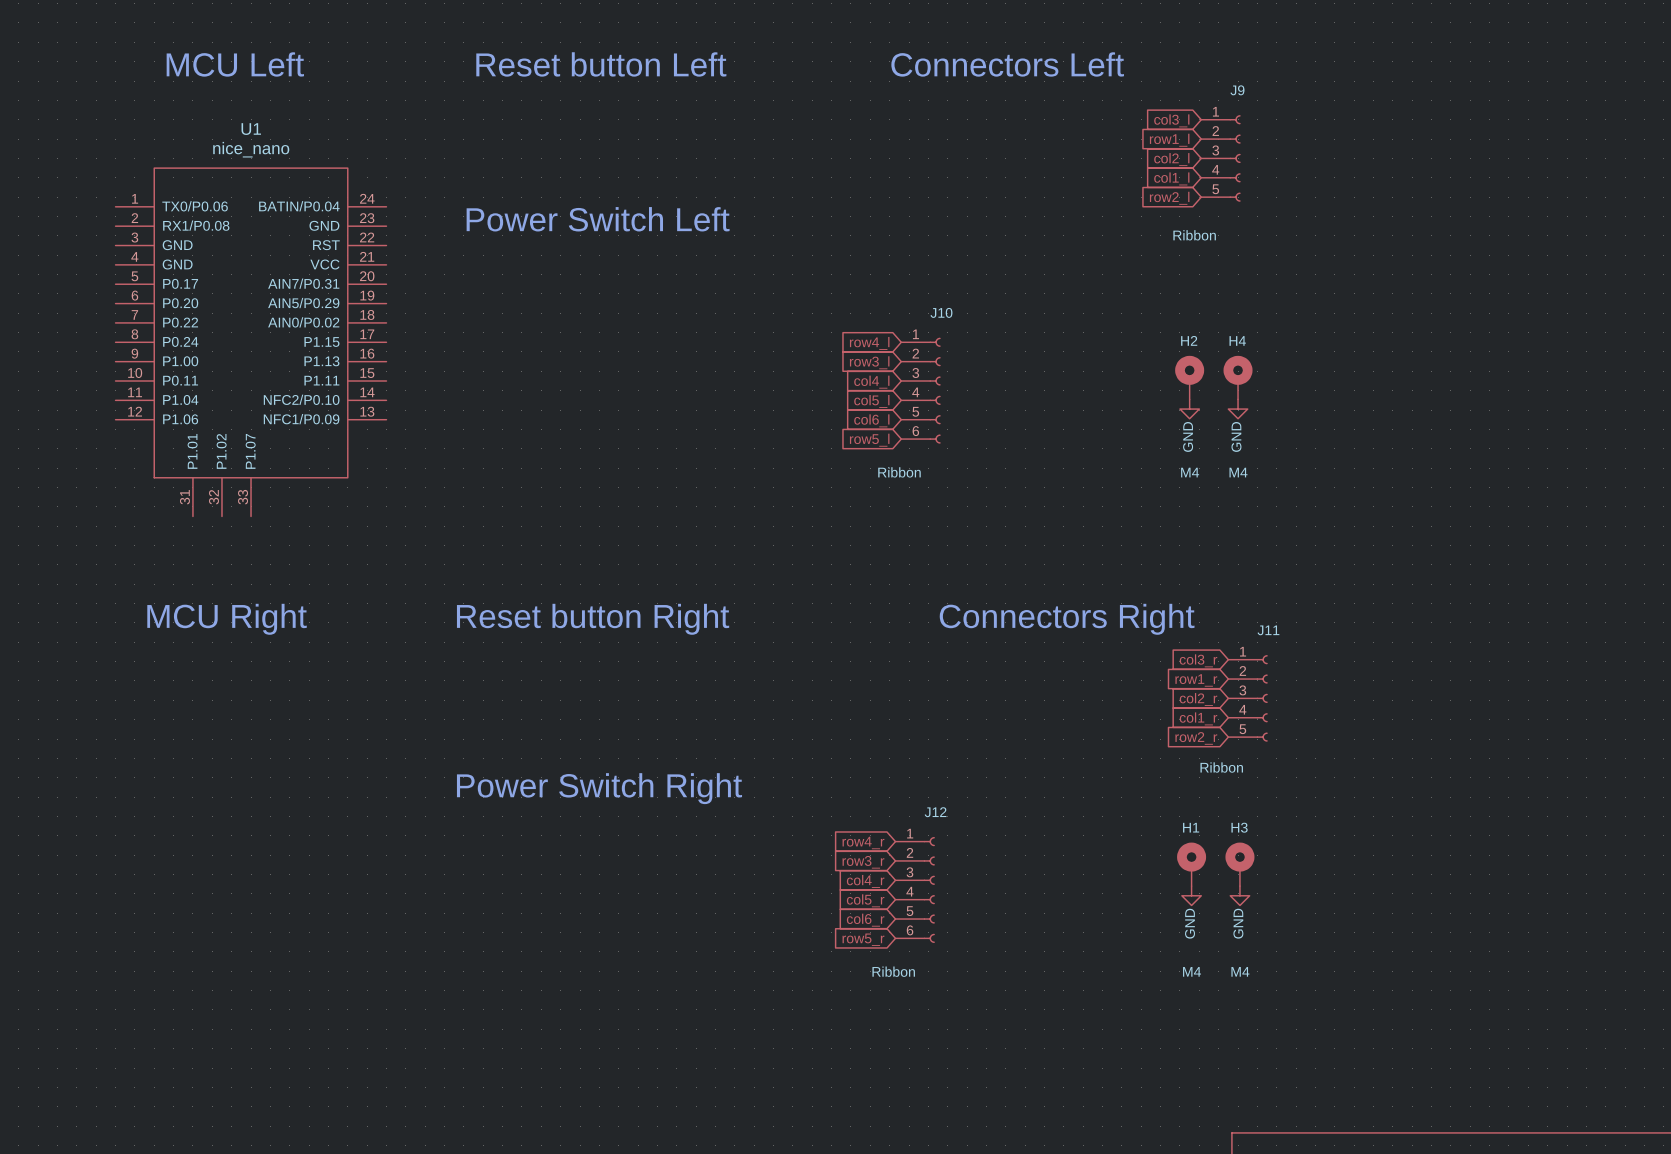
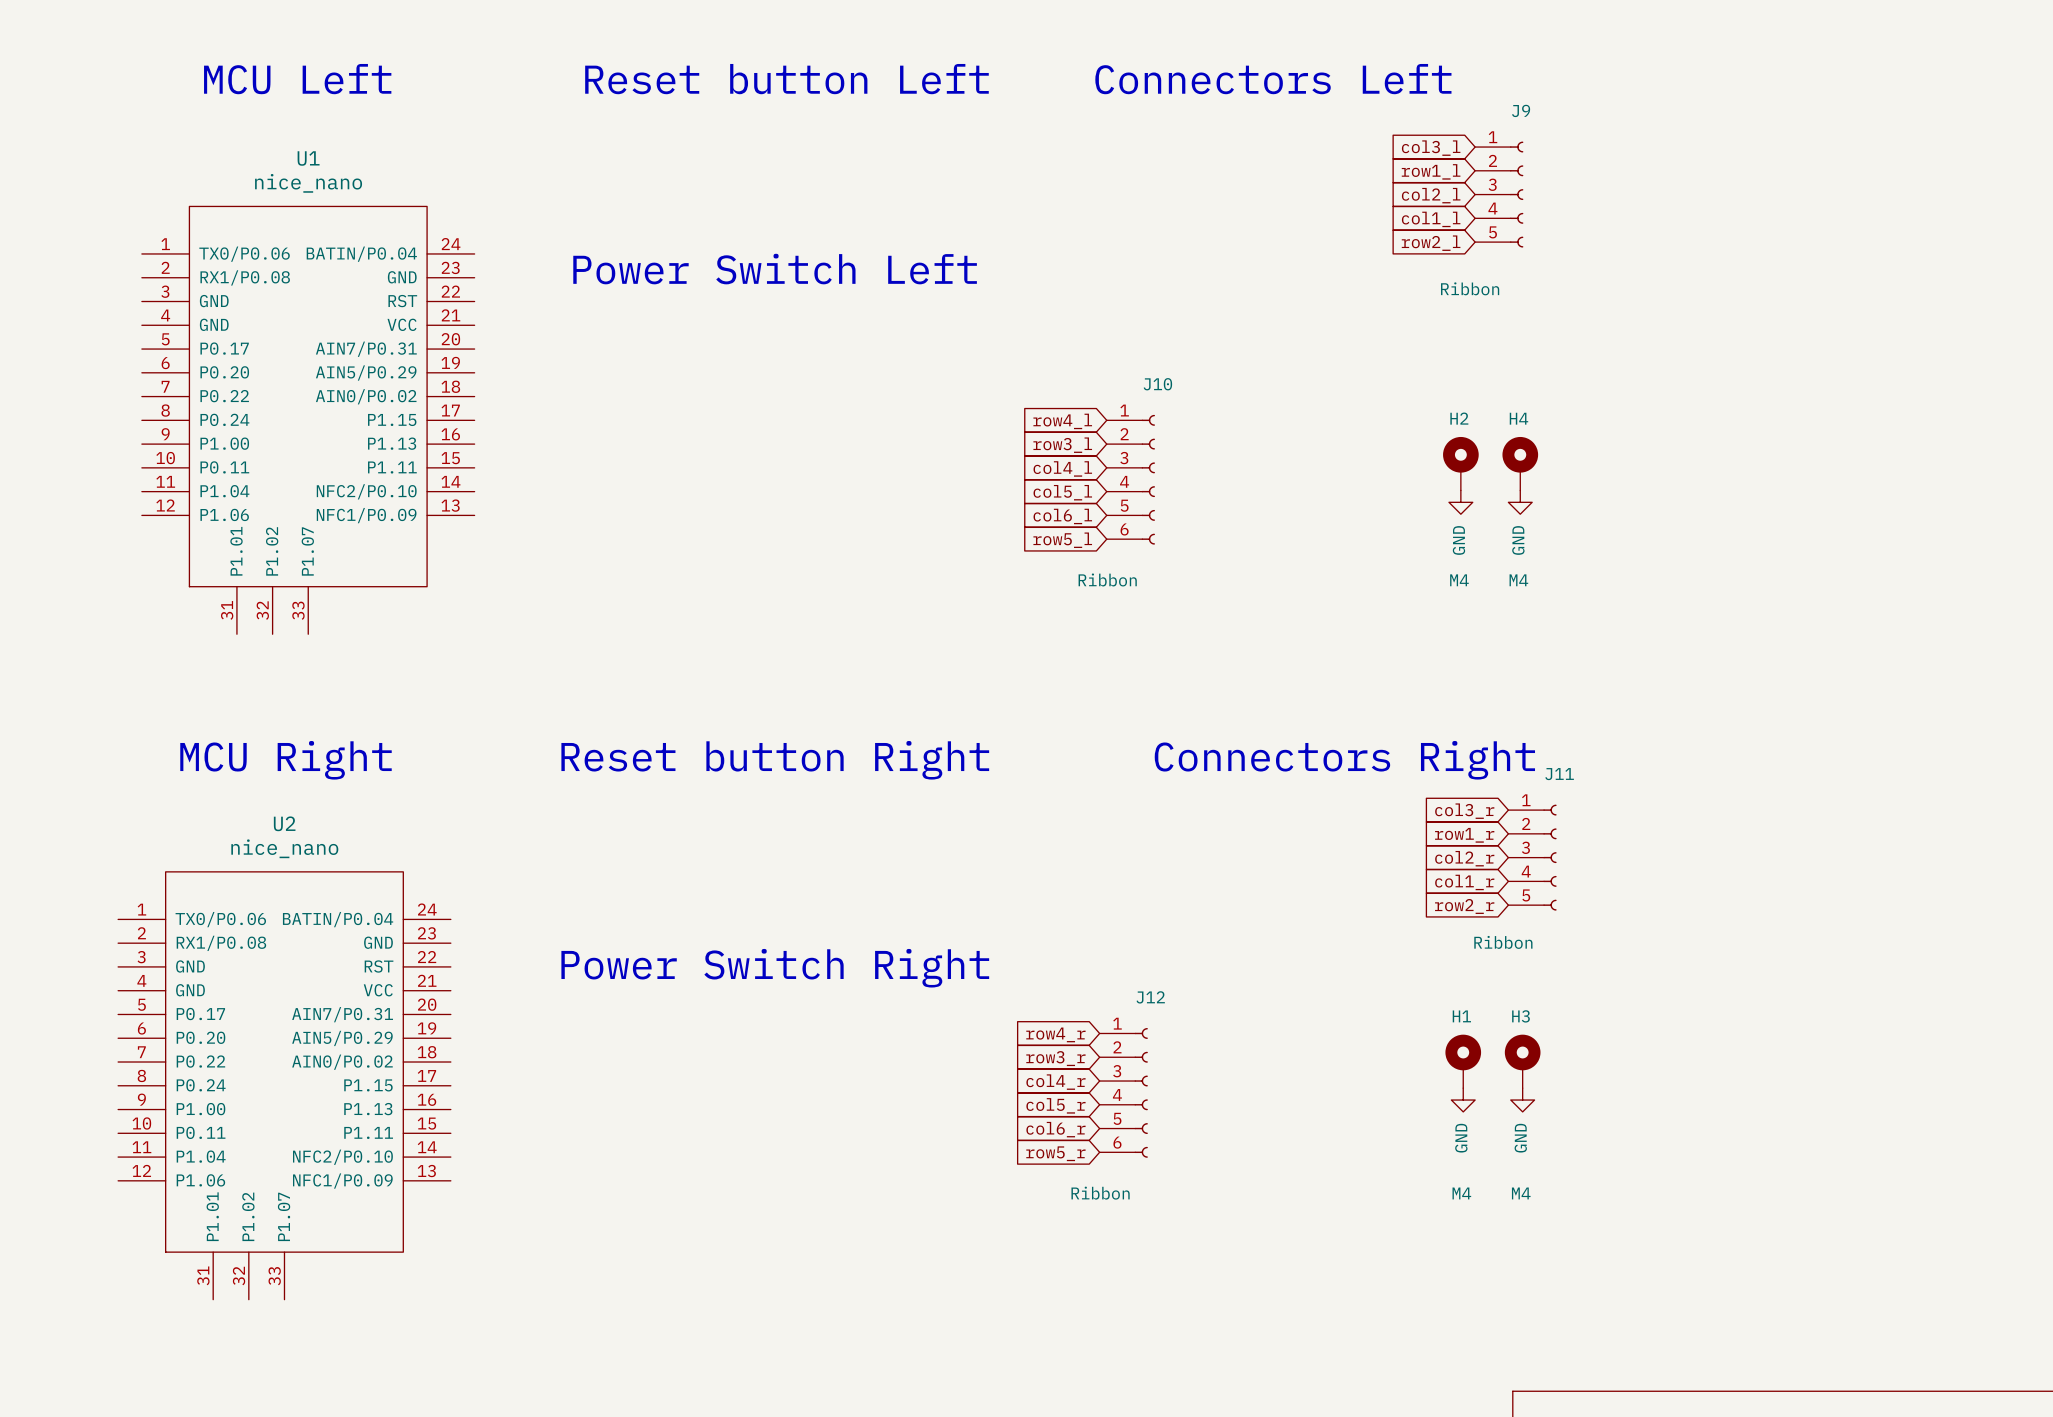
U2: none -> nice_nano (284, 1085)

